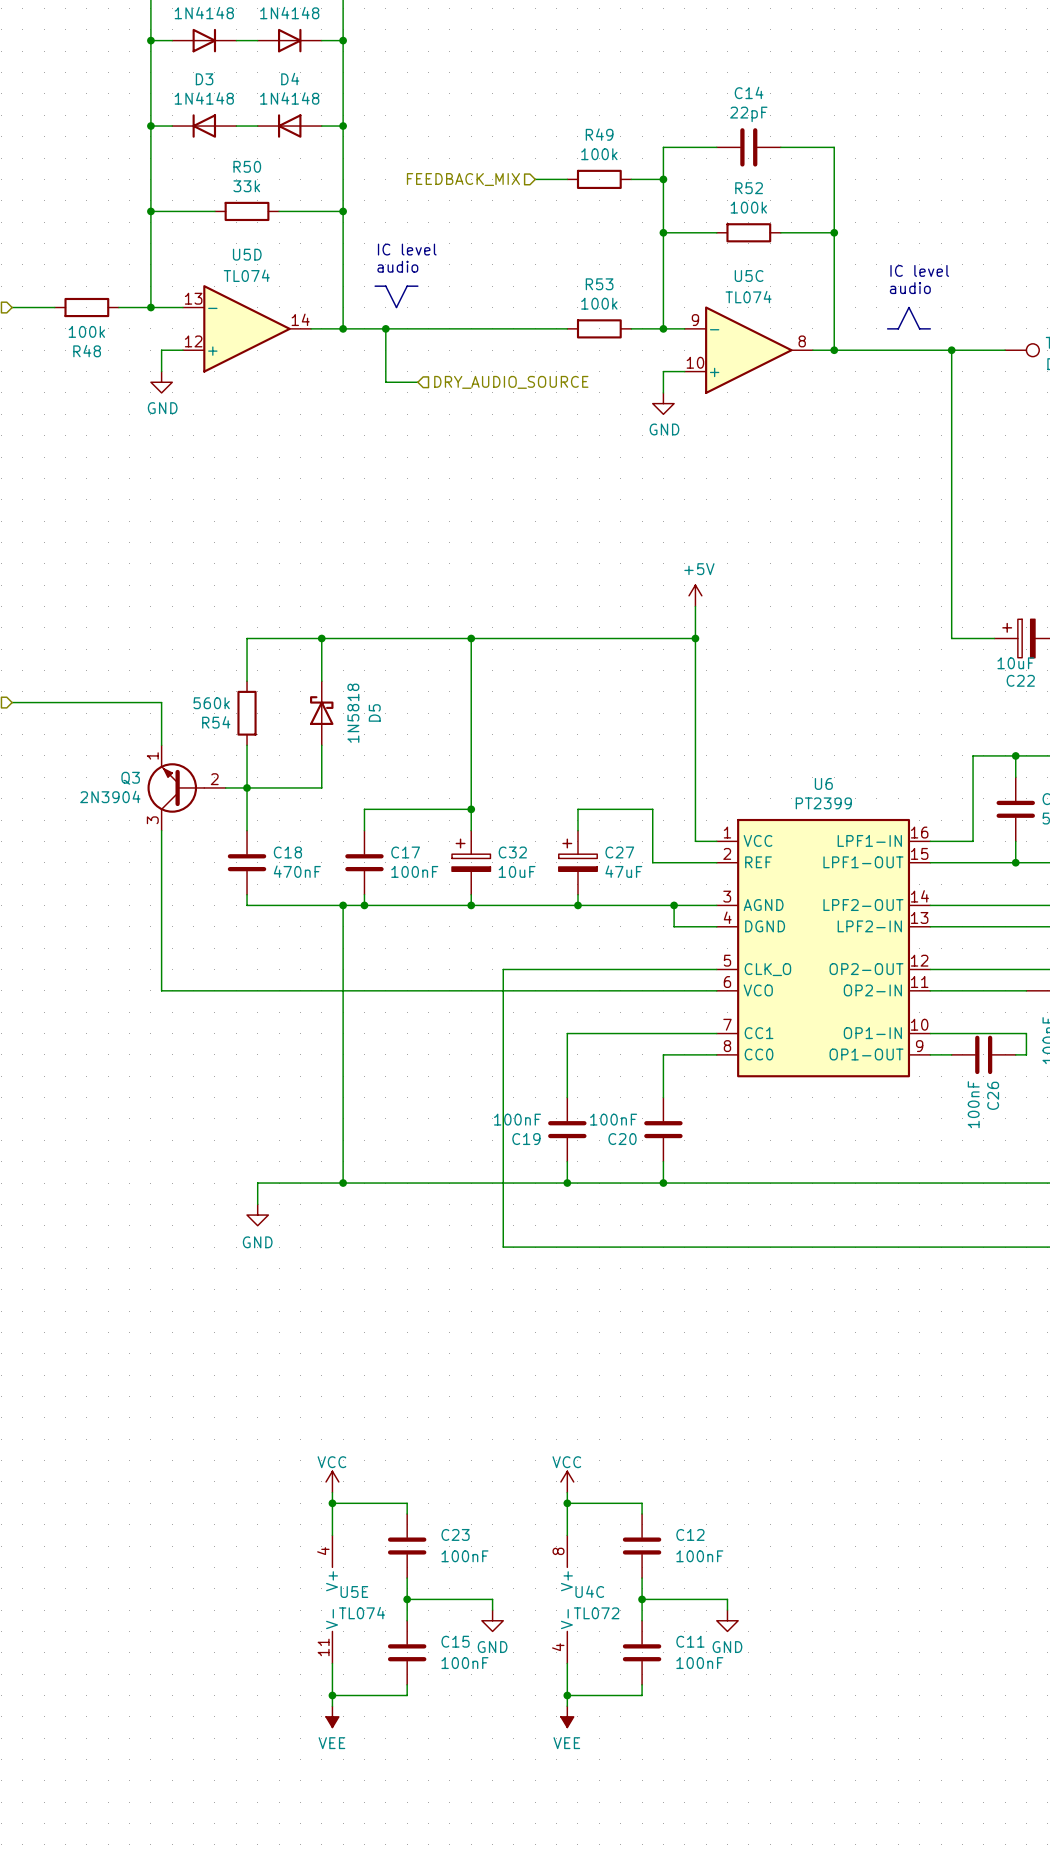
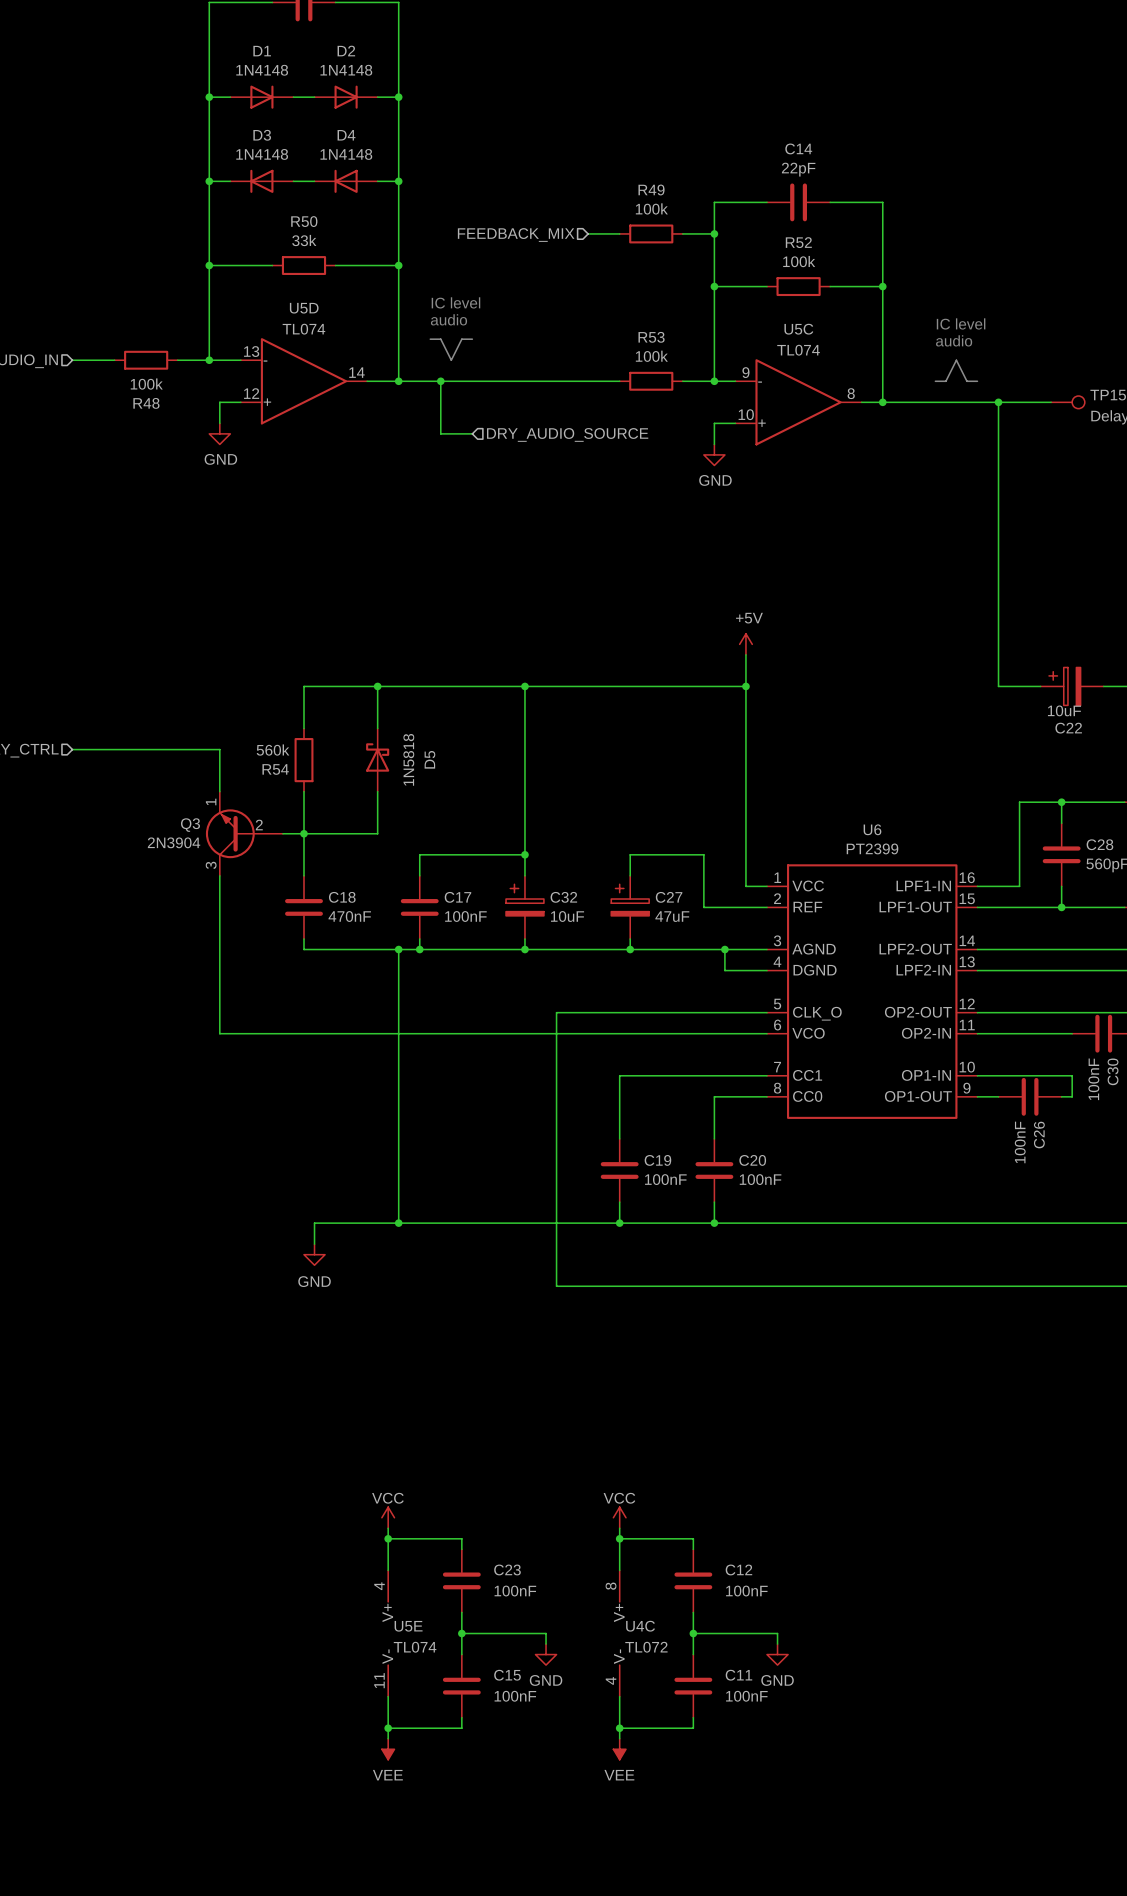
Q3 symbol: [147, 745, 226, 831] -> [205, 791, 283, 876]
C19 value position: 100nF (517, 1119) -> 100nF (665, 1179)
C20 value position: 100nF (613, 1119) -> 100nF (760, 1179)
C19 name position: C19 (526, 1139) -> C19 (657, 1160)
C20 name position: C20 (622, 1139) -> C20 (752, 1160)

